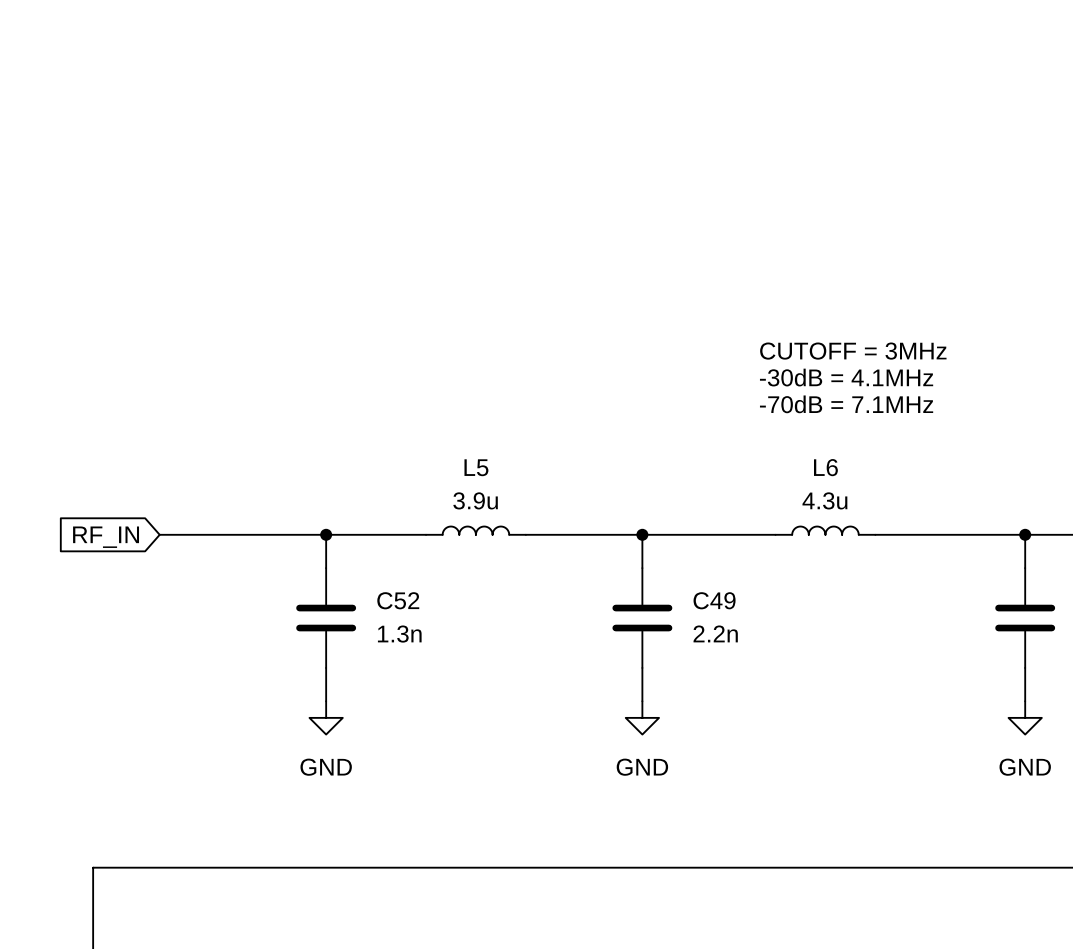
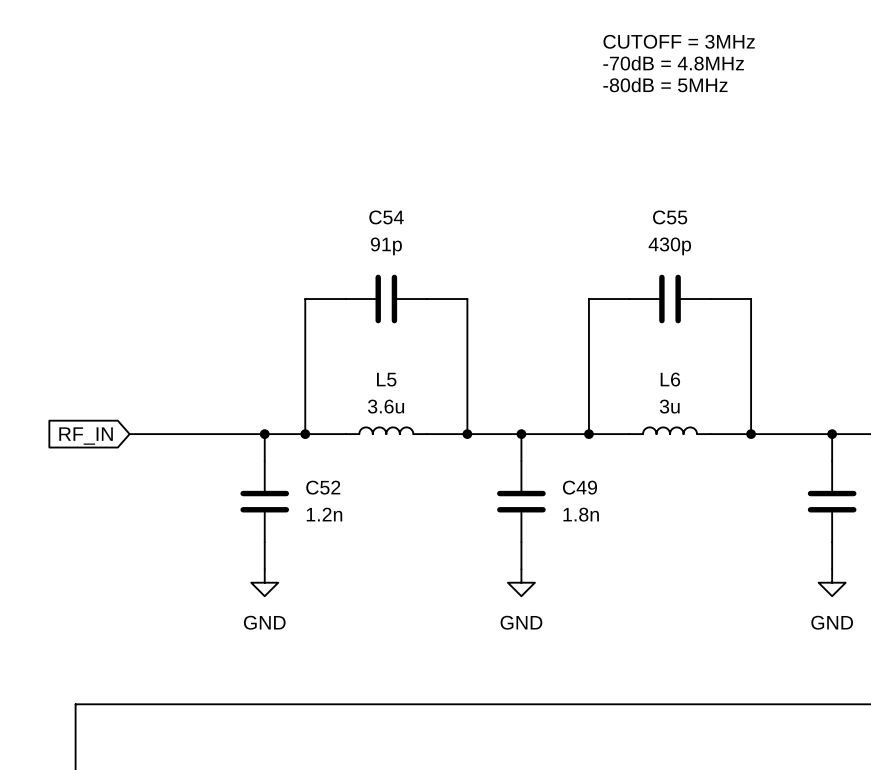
text: none -> -70dB = 4.8MHz (673, 63)
text: none -> -80dB = 5MHz (665, 85)
text position: CUTOFF = 3MHz (853, 351) -> CUTOFF = 3MHz (679, 41)
wire: none -> (345, 299) (305, 299) (305, 434)
C54: none -> 91p (386, 299)
wire: none -> (426, 299) (467, 299) (467, 434)
wire: none -> (629, 299) (588, 299) (588, 434)
C55: none -> 430p (670, 299)
wire: none -> (710, 299) (751, 299) (751, 434)
text: -30dB = 4.1MHz (846, 377) -> none
text: -70dB = 7.1MHz (846, 404) -> none
L5 value: 3.9u (475, 500) -> 3.6u (386, 406)
L6 value: 4.3u (824, 500) -> 3u (669, 406)
junction: none -> (305, 434)
junction: none -> (467, 434)
junction: none -> (588, 434)
junction: none -> (751, 434)
C49 value: 2.2n (715, 633) -> 1.8n (581, 514)
C52 value: 1.3n (399, 634) -> 1.2n (324, 514)

